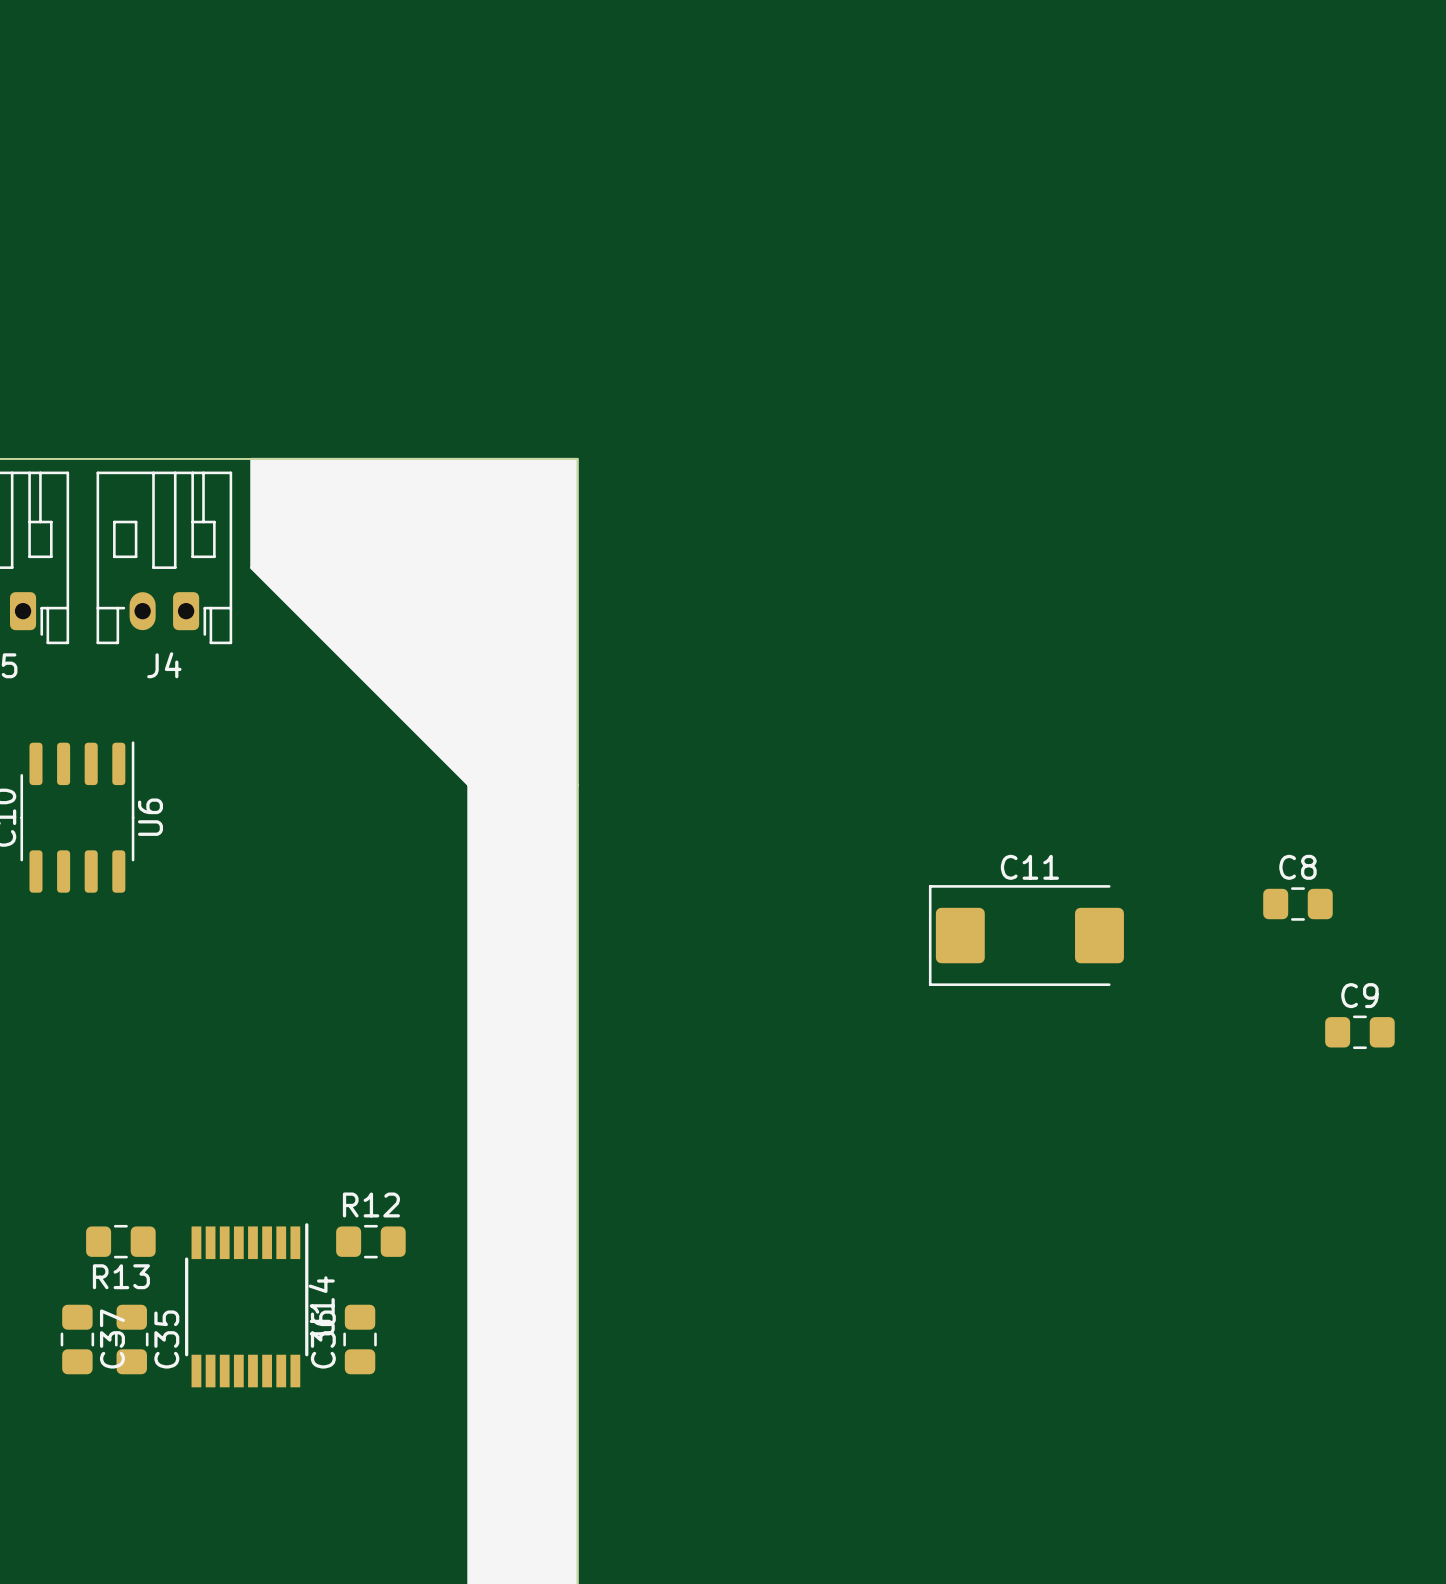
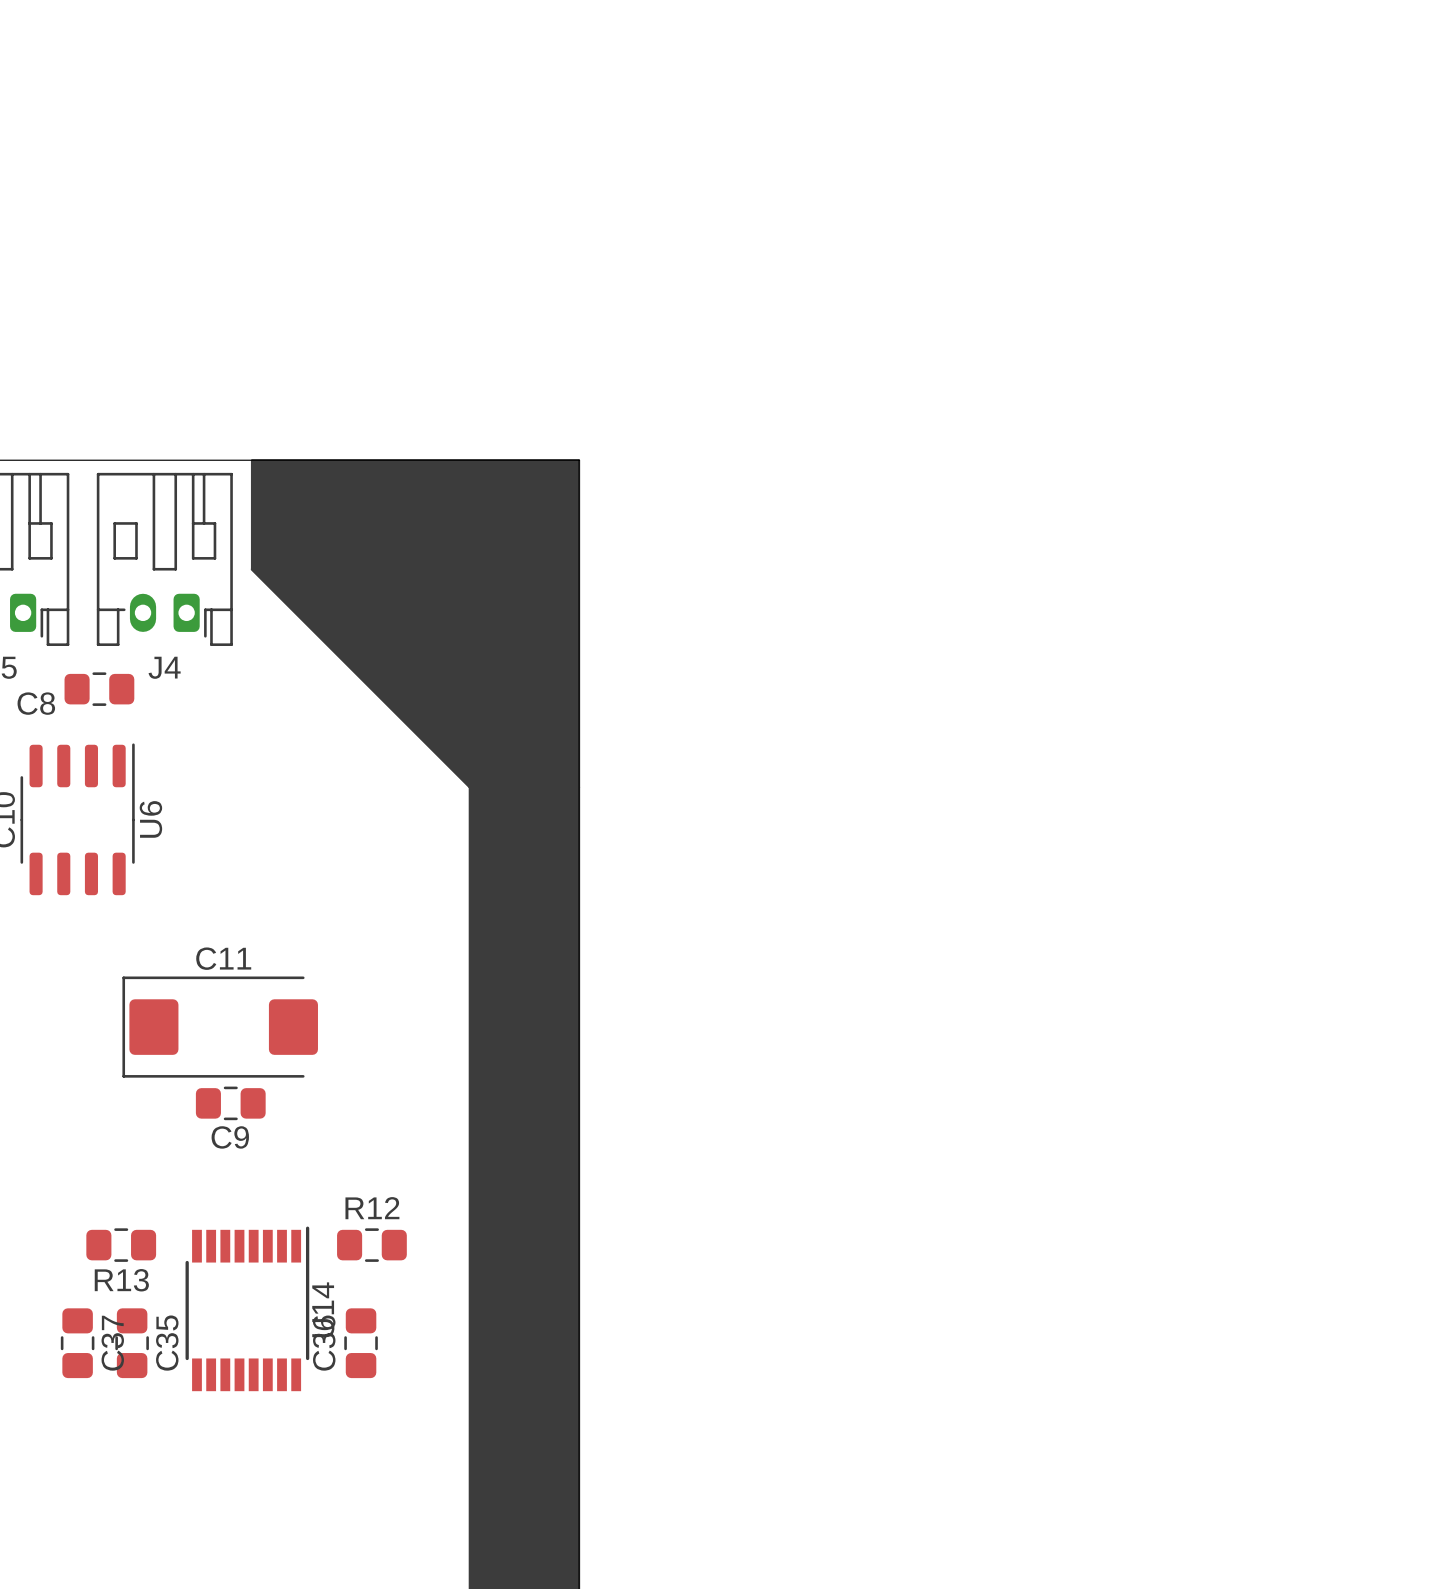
C8 name position: C8 (1297, 867) -> C8 (36, 703)
C8 position: (1297, 904) -> (99, 689)
C11 position: (1026, 935) -> (220, 1027)
C9 name position: C9 (1359, 995) -> C9 (230, 1137)
C9 position: (1359, 1032) -> (230, 1103)

